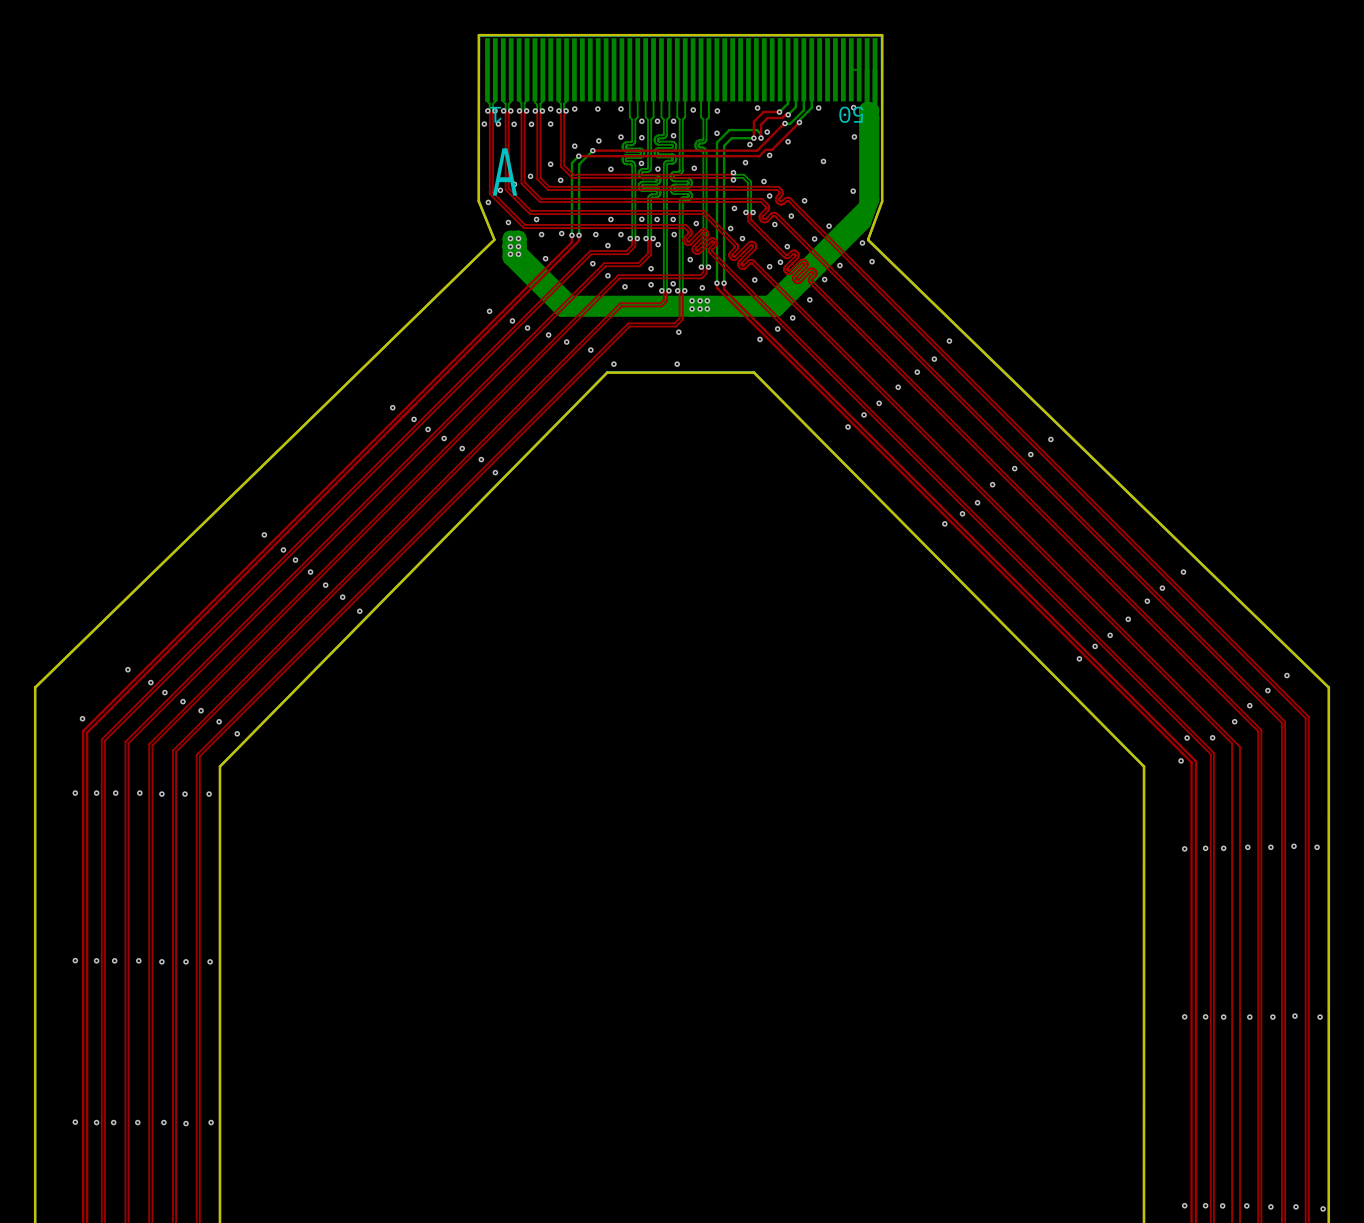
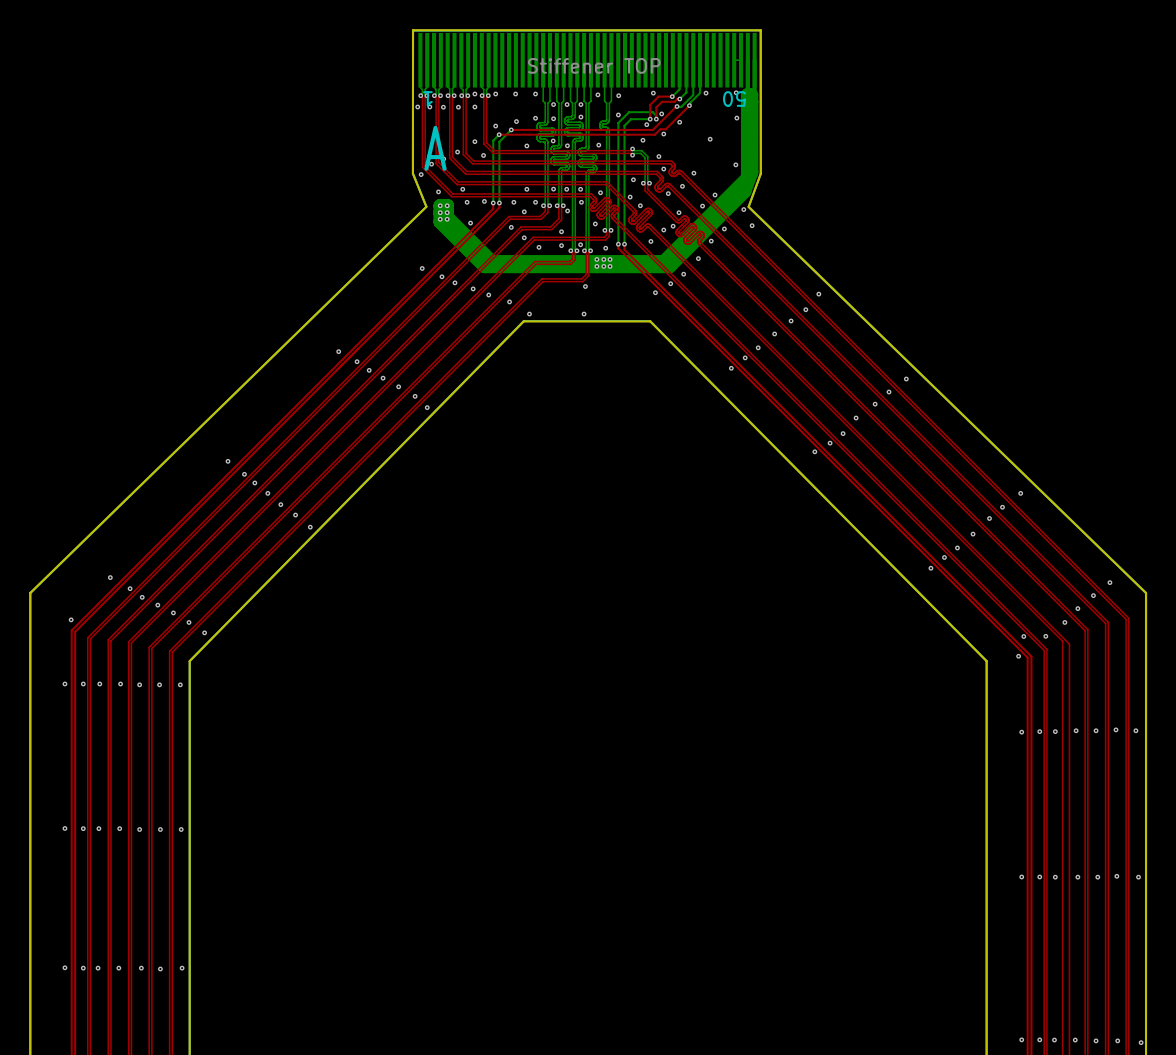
text: none -> Stiffener TOP (594, 65)

